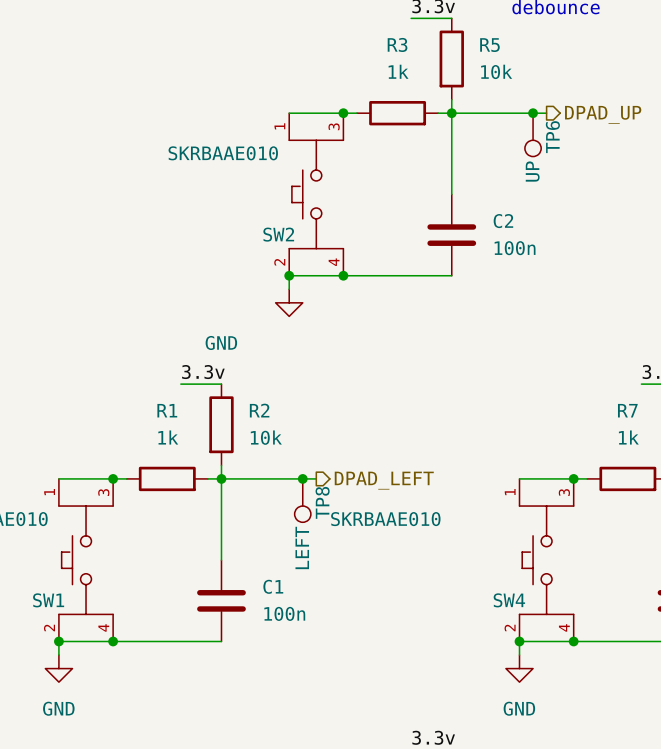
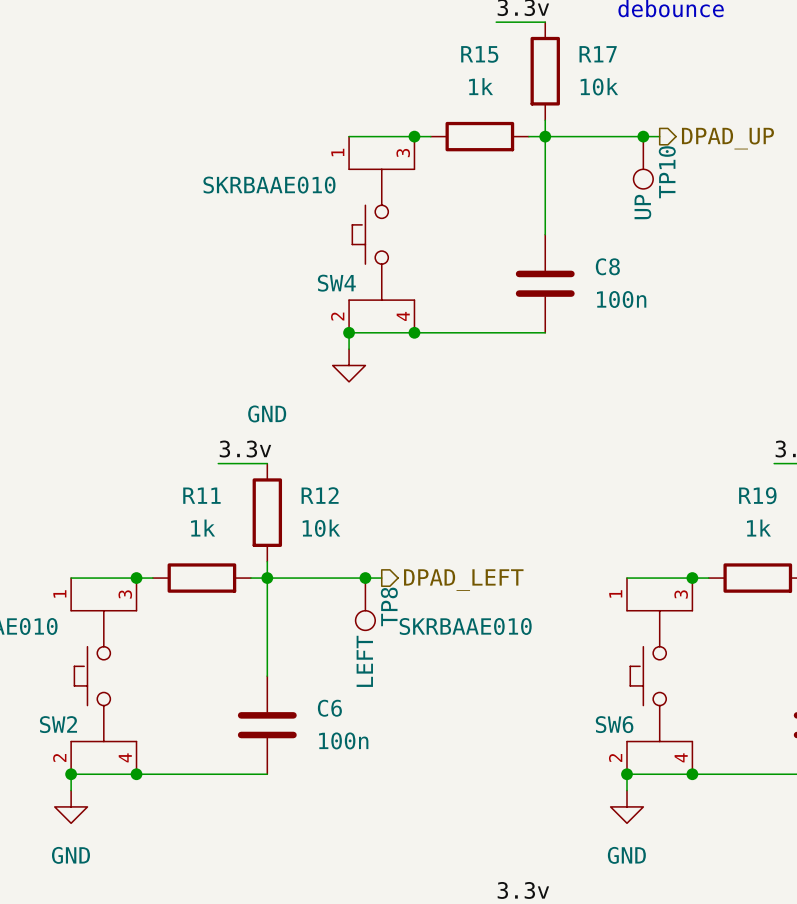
R3 name: R3 (397, 44) -> R15 (479, 54)
R5 name: R5 (489, 45) -> R17 (598, 54)
TP6 name: TP6 (552, 137) -> TP10 (667, 172)
C2 name: C2 (503, 221) -> C8 (607, 266)
SW2 name: SW2 (278, 234) -> SW4 (336, 283)
R1 name: R1 (167, 410) -> R11 (201, 495)
R2 name: R2 (259, 410) -> R12 (320, 495)
R7 name: R7 (627, 410) -> R19 (757, 495)
C1 name: C1 (273, 586) -> C6 (329, 708)
SW1 name: SW1 (48, 600) -> SW2 (58, 724)
SW4 name: SW4 (509, 600) -> SW6 (614, 724)

